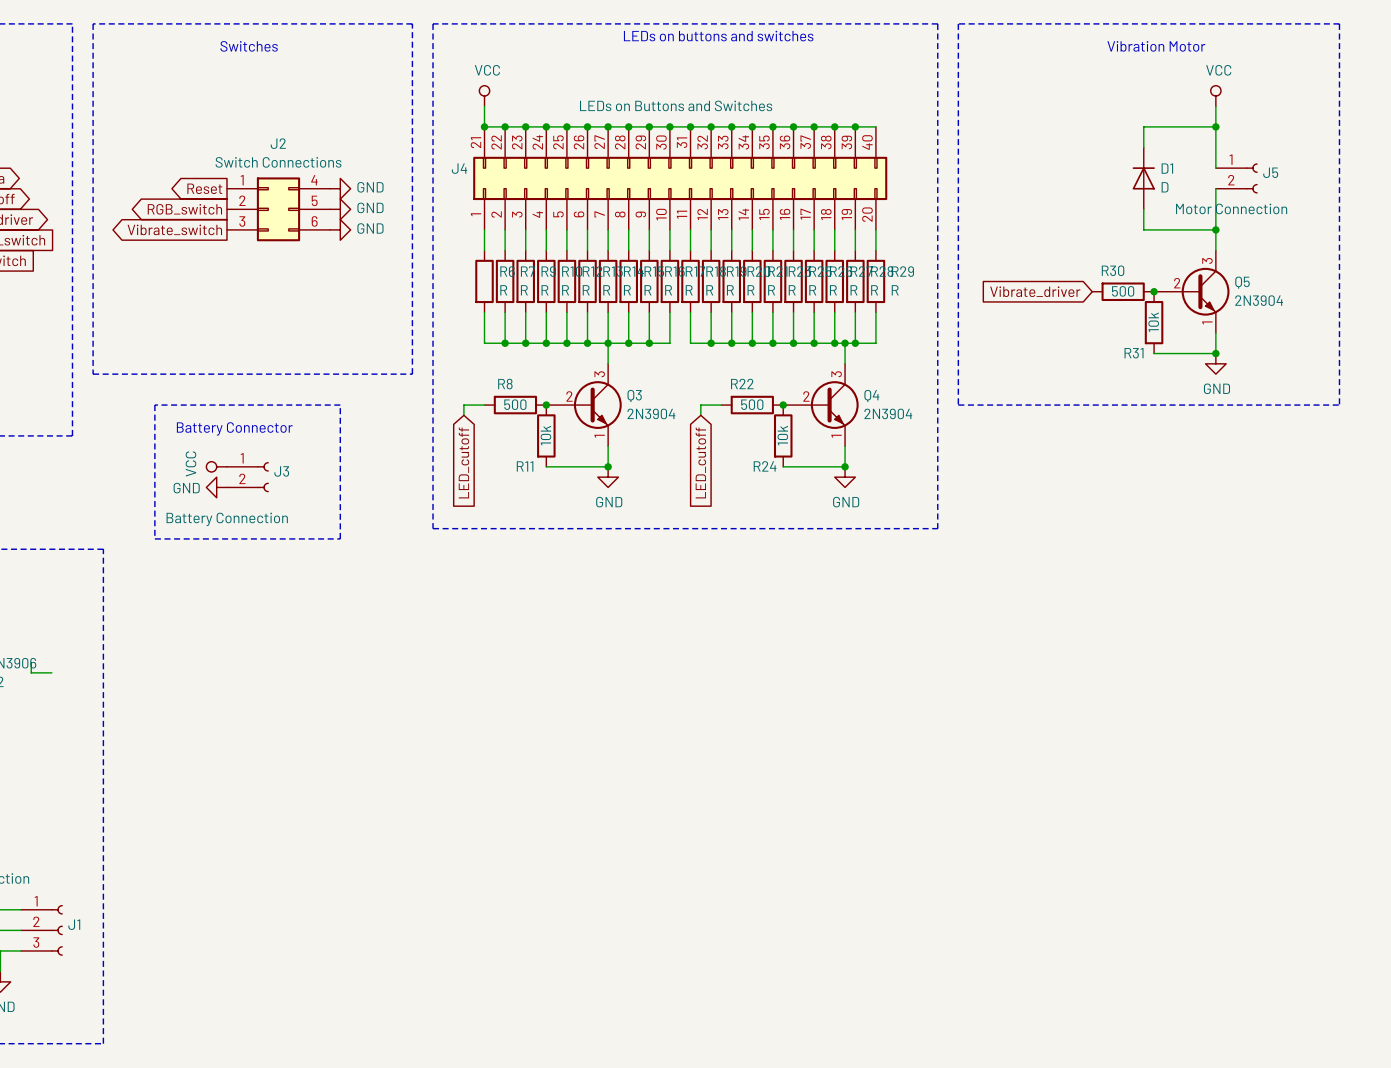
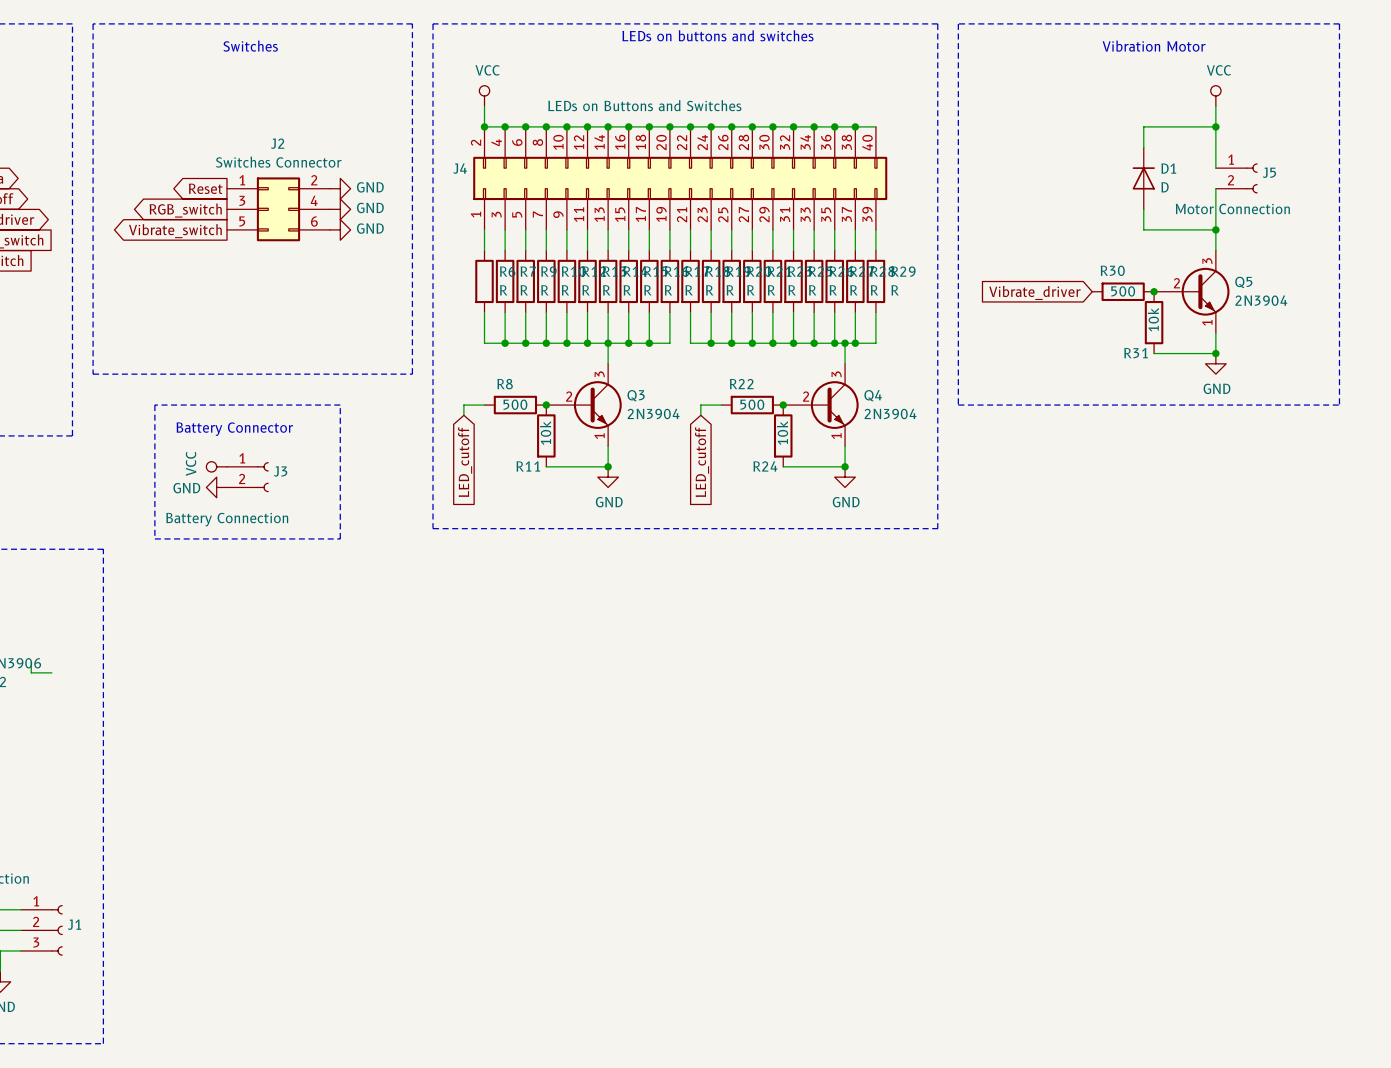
J4 value position: LEDs on Buttons and Switches (676, 105) -> LEDs on Buttons and Switches (644, 105)
J4 symbol: [473, 126, 888, 230] -> [473, 126, 888, 230]
J2 value: Switch Connections (278, 162) -> Switches Connector (278, 162)
J2 pin number: 4 (314, 180) -> 2 (314, 180)
J2 pin number: 2 (242, 200) -> 3 (242, 200)
J2 pin number: 5 (314, 200) -> 4 (314, 200)
J2 pin number: 3 (242, 221) -> 5 (242, 221)

